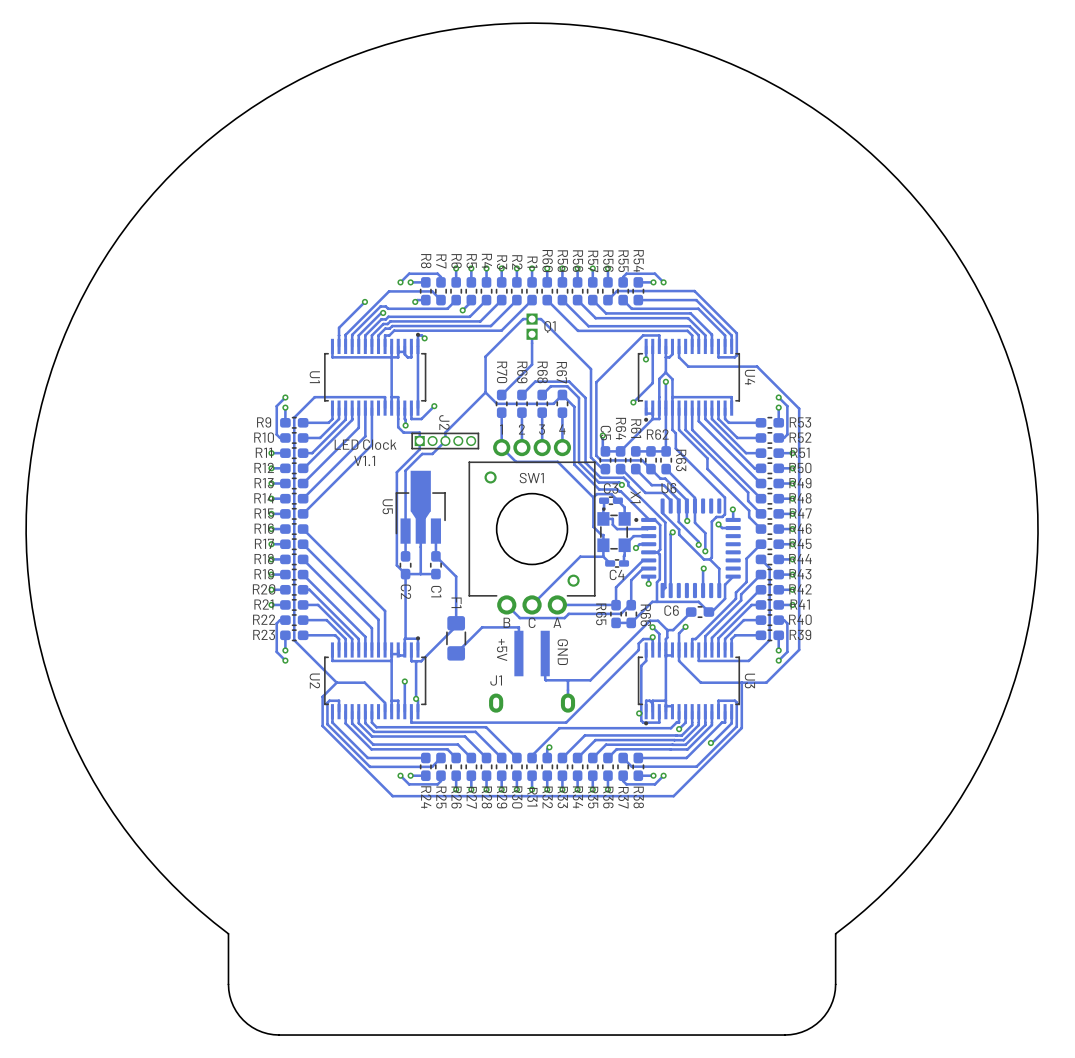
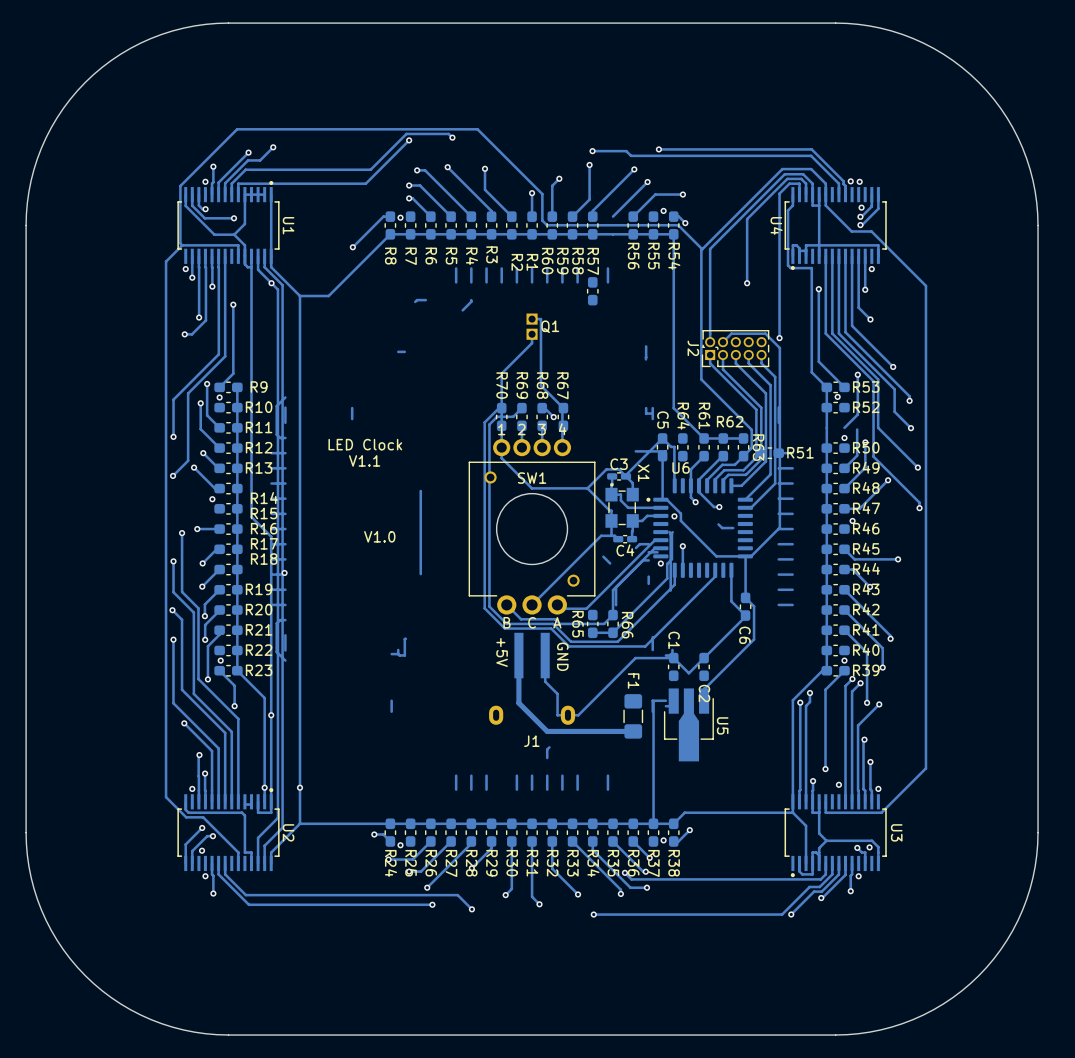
track: none -> (452, 137) (448, 133) (406, 133) (370, 169) (245, 169) (231, 183) (231, 194)
via: none -> (452, 137)
track: none -> (409, 140) (365, 183) (238, 183) (238, 194)
via: none -> (409, 140)
track: none -> (273, 147) (260, 160) (248, 160) (225, 183) (225, 194)
via: none -> (273, 147)
track: none -> (658, 149) (811, 149) (843, 181) (845, 194)
via: none -> (658, 149)
track: none -> (592, 151) (626, 151) (631, 155) (811, 155) (838, 183) (838, 194)
via: none -> (592, 151)
track: none -> (248, 152) (218, 182) (218, 194)
via: none -> (248, 152)
track: none -> (589, 164) (589, 199) (572, 216)
via: none -> (589, 164)
track: none -> (213, 166) (212, 194)
via: none -> (213, 166)
track: none -> (447, 167) (491, 211) (491, 216)
via: none -> (447, 167)
track: none -> (485, 168) (485, 189) (511, 216)
via: none -> (485, 168)
track: none -> (634, 169) (592, 210) (592, 216)
via: none -> (634, 169)
track: none -> (417, 170) (425, 170) (471, 216)
via: none -> (417, 170)
track: none -> (559, 178) (552, 185) (552, 216)
via: none -> (559, 178)
via: none -> (205, 181)
via: none -> (850, 181)
via: none -> (859, 181)
track: none -> (647, 182) (613, 216)
via: none -> (647, 182)
track: none -> (409, 185) (420, 185) (451, 216)
via: none -> (409, 185)
track: none -> (532, 193) (532, 216)
via: none -> (532, 193)
track: none -> (185, 194) (185, 205) (214, 234) (234, 234)
track: none -> (192, 194) (192, 205) (204, 218) (234, 218)
track: none -> (198, 194) (198, 205) (205, 209)
track: none -> (264, 194) (244, 194) (244, 223) (234, 234)
track: none -> (271, 194) (271, 267) (300, 296)
track: none -> (682, 194) (655, 194) (633, 216)
via: none -> (682, 194)
track: none -> (792, 194) (792, 205) (788, 210) (788, 265) (790, 268) (811, 268) (811, 372) (826, 387) (826, 670) (822, 670) (792, 700) (792, 812)
track: none -> (799, 194) (799, 183) (789, 183) (779, 193) (779, 338)
track: none -> (806, 194) (806, 183) (801, 178) (787, 178) (747, 219) (747, 283)
track: none -> (819, 194) (819, 256)
track: none -> (871, 194) (871, 206) (860, 216)
track: none -> (878, 194) (878, 208) (860, 225)
track: none -> (409, 198) (412, 198) (430, 216)
via: none -> (409, 198)
track: none -> (819, 205) (812, 205) (812, 183) (803, 174) (784, 174) (710, 248) (710, 342)
via: none -> (861, 207)
via: none -> (205, 209)
via: none -> (663, 210)
track: none -> (390, 216) (383, 216) (352, 247)
track: none -> (673, 216) (678, 216) (685, 223)
via: none -> (860, 216)
via: none -> (400, 217)
via: none -> (234, 218)
via: none -> (685, 223)
via: none -> (860, 225)
track: none -> (234, 234) (244, 245) (244, 264) (251, 267)
track: none -> (182, 245) (238, 245) (238, 256)
track: none -> (182, 245) (180, 243) (180, 186) (237, 129) (477, 129) (542, 194) (542, 220) (547, 225) (678, 225) (702, 249)
track: none -> (182, 245) (166, 261) (166, 797) (186, 817) (203, 817) (238, 852) (238, 863)
via: none -> (352, 247)
track: none -> (806, 250) (799, 250)
track: none -> (192, 256) (192, 277)
track: none -> (198, 256) (199, 317)
track: none -> (205, 256) (205, 320) (191, 334) (184, 334)
track: none -> (212, 256) (212, 286)
track: none -> (218, 256) (218, 354) (173, 399) (173, 436)
track: none -> (225, 256) (225, 356) (188, 393) (188, 460) (173, 475)
track: none -> (251, 256) (251, 516) (271, 536) (271, 812) (258, 812) (258, 801)
track: none -> (258, 256) (258, 269) (277, 289) (277, 818) (258, 837) (258, 863)
track: none -> (264, 256) (264, 267) (282, 285) (282, 827) (264, 845) (264, 863)
track: none -> (799, 256) (799, 248) (796, 245) (792, 245) (792, 256)
track: none -> (825, 256) (825, 333) (873, 381) (873, 456) (919, 502) (919, 508)
track: none -> (832, 256) (832, 333) (878, 379) (878, 427) (917, 467)
track: none -> (838, 256) (838, 333) (894, 389) (894, 411) (911, 428)
track: none -> (845, 256) (845, 332) (909, 396) (909, 400)
track: none -> (852, 256) (852, 325) (893, 366)
track: none -> (858, 256) (858, 307) (870, 319)
track: none -> (865, 256) (865, 289)
track: none -> (878, 256) (878, 245) (806, 245) (806, 256)
R8 name position: R8 (426, 261) -> R8 (390, 256)
R7 name position: R7 (441, 261) -> R7 (411, 256)
R6 name position: R6 (456, 261) -> R6 (431, 256)
R5 name position: R5 (471, 261) -> R5 (451, 256)
R4 name position: R4 (486, 261) -> R4 (471, 256)
R56 name position: R56 (608, 261) -> R56 (633, 256)
R55 name position: R55 (623, 261) -> R55 (653, 256)
R54 name position: R54 (638, 261) -> R54 (674, 256)
R3 name position: R3 (502, 262) -> R3 (491, 254)
via: (456, 268) -> none
via: (471, 268) -> none
via: (486, 268) -> none
via: (501, 268) -> none
via: (516, 268) -> none
via: (532, 268) -> none
via: (547, 268) -> none
via: (562, 268) -> none
via: (577, 268) -> none
track: (592, 268) (592, 282) -> none
via: (592, 268) -> none
via: (607, 268) -> none
via: none -> (185, 269)
via: none -> (871, 269)
via: none -> (192, 277)
via: (400, 282) -> none
via: (410, 282) -> none
track: (425, 282) (410, 282) -> none
track: (440, 282) (440, 277) (437, 273) (409, 273) (400, 282) -> none
track: (653, 282) (638, 282) -> none
via: (653, 282) -> none
track: (663, 282) (654, 273) (626, 273) (623, 277) (623, 282) -> none
via: (663, 282) -> none
via: none -> (271, 283)
via: none -> (747, 283)
via: none -> (212, 286)
track: none -> (818, 289) (818, 361) (844, 387)
via: none -> (818, 289)
via: none -> (865, 289)
R8 position: (425, 291) -> (390, 225)
R7 position: (440, 291) -> (410, 225)
R6 position: (456, 291) -> (430, 225)
R5 position: (471, 291) -> (451, 225)
R4 position: (486, 291) -> (471, 225)
R3 position: (501, 291) -> (491, 225)
R2 position: (516, 291) -> (511, 225)
R1 position: (532, 291) -> (532, 225)
R60 position: (547, 291) -> (552, 225)
R59 position: (562, 291) -> (572, 225)
R58 position: (577, 291) -> (592, 225)
R56 position: (607, 291) -> (633, 225)
R55 position: (623, 291) -> (653, 225)
R54 position: (638, 291) -> (673, 225)
track: none -> (300, 296) (328, 296) (390, 234) (673, 234) (673, 408) (704, 438) (743, 438)
track: none -> (300, 296) (300, 823)
track: (440, 300) (432, 291) (389, 291) (345, 334) (345, 346) -> none
track: (456, 300) (447, 308) (388, 308) (385, 306) (380, 306) (352, 334) (352, 346) -> none
track: (486, 300) (469, 316) (388, 316) (385, 319) (381, 319) (365, 335) (365, 346) -> none
track: (501, 300) (480, 321) (390, 321) (387, 324) (383, 324) (371, 335) (371, 346) -> none
track: (516, 300) (490, 326) (392, 326) (389, 328) (385, 328) (378, 335) (378, 346) -> none
track: (532, 300) (501, 330) (394, 330) (389, 335) (385, 335) (385, 346) -> none
track: (547, 300) (577, 330) (687, 330) (692, 335) (692, 346) -> none
track: (562, 300) (588, 326) (689, 326) (698, 335) (698, 346) -> none
track: (577, 300) (595, 318) (688, 318) (705, 335) (705, 346) -> none
track: (592, 300) (606, 313) (690, 313) (711, 334) (711, 346) -> none
track: (607, 300) (617, 291) (694, 291) (736, 333) (736, 355) (734, 357) (718, 357) (718, 346) -> none
track: (623, 300) (631, 308) (698, 308) (725, 335) (725, 346) -> none
track: (638, 300) (696, 300) (731, 335) (731, 346) -> none
track: (364, 301) (339, 327) (339, 346) -> none
via: (364, 301) -> none
via: (415, 301) -> none
track: none -> (233, 304) (233, 373) (219, 387)
via: none -> (233, 304)
via: (462, 310) -> none
track: (383, 312) (358, 335) (358, 346) -> none
via: (383, 312) -> none
via: none -> (199, 317)
track: (532, 319) (523, 319) (485, 356) (485, 392) -> none
track: (540, 319) (591, 369) (591, 457) (602, 469) (605, 469) -> (540, 319) (540, 385) (563, 408)
via: none -> (870, 319)
via: none -> (184, 334)
track: (424, 338) (421, 335) (417, 335) (417, 408) -> none
via: (424, 338) -> none
via: none -> (779, 338)
track: none -> (723, 342) (731, 333) (765, 333) (779, 348) (779, 527) (750, 556) (745, 556)
track: (532, 343) (532, 364) (501, 394) -> (532, 343) (501, 373) (501, 408) (499, 408) (484, 422) (484, 608) (504, 628) (551, 628) (569, 646) (645, 646) (715, 576) (715, 570)
track: (391, 346) (391, 408) -> none
track: (398, 346) (398, 357) (332, 357) (332, 346) -> none
track: (411, 346) (411, 357) (404, 354) (404, 346) -> none
track: (652, 346) (652, 383) (633, 402) -> none
track: (659, 346) (659, 335) (643, 335) (596, 382) (596, 455) (601, 460) (642, 460) (660, 478) (665, 478) (686, 500) (687, 520) -> none
track: (665, 346) (665, 372) (659, 378) (659, 419) (652, 419) (620, 451) (605, 451) (602, 448) (602, 435) -> none
track: (672, 346) (672, 354) (665, 357) -> none
track: (679, 346) (679, 357) (688, 366) (757, 366) (799, 408) (799, 649) (766, 682) (700, 682) (679, 660) (679, 633) (685, 626) -> none
track: none -> (710, 355) (710, 363) (756, 409) (756, 457) (743, 470) (724, 470) (715, 479) (715, 485)
track: none -> (723, 355) (723, 369) (761, 407) (761, 459) (745, 474) (728, 474) (723, 480) (723, 485)
track: none -> (735, 355) (735, 363) (765, 393) (765, 461) (741, 485) (731, 485)
track: none -> (748, 355) (748, 363) (770, 385) (770, 474) (745, 499)
track: none -> (761, 355) (761, 363) (775, 377) (775, 483) (751, 507) (745, 507)
via: (645, 359) -> none
via: none -> (893, 366)
track: (665, 372) (672, 379) (672, 397) -> none
U1 position: (375, 374) -> (228, 222)
track: none -> (857, 374) (857, 414) (844, 427)
via: none -> (857, 374)
U1 name position: U1 (314, 377) -> U1 (288, 225)
U4 name position: U4 (749, 377) -> U4 (776, 225)
U4 position: (688, 380) -> (835, 228)
track: (665, 381) (666, 451) -> none
via: (665, 381) -> none
track: none -> (207, 383) (207, 415) (219, 427)
via: none -> (207, 383)
track: none -> (237, 387) (237, 670) (264, 698) (264, 801)
track: (485, 392) (496, 403) (553, 403) (562, 394) (574, 406) (574, 464) (599, 489) (617, 489) (620, 491) (648, 519) (654, 519) (660, 525) (660, 549) (657, 552) (659, 554) (659, 579) (656, 582) (656, 601) -> none
track: (485, 392) (445, 432) (445, 441) (432, 453) (422, 453) (405, 470) (405, 556) -> none
track: (521, 394) (535, 381) (569, 381) (585, 397) (585, 462) (600, 477) (623, 477) (628, 482) (628, 485) (665, 522) (665, 587) (662, 590) -> none
track: (542, 394) (550, 386) (567, 386) (578, 397) (578, 462) (598, 482) (619, 482) (621, 484) -> none
via: none -> (837, 396)
via: none -> (219, 397)
via: (285, 397) -> none
track: (391, 397) (398, 397) (398, 427) (403, 432) (419, 432) (419, 449) (396, 472) (396, 565) (405, 574) -> none
track: (672, 397) (672, 429) (675, 433) (675, 448) (724, 497) (724, 514) (722, 516) (716, 516) (711, 521) (711, 557) (709, 559) -> none
track: (672, 397) (731, 397) (731, 408) -> none
track: (778, 397) (787, 406) (787, 434) (784, 437) (778, 437) -> none
via: (778, 397) -> none
via: none -> (909, 400)
via: (633, 402) -> none
track: none -> (200, 403) (200, 429) (219, 448)
via: none -> (200, 403)
R70 position: (501, 403) -> (501, 416)
R69 position: (521, 403) -> (521, 416)
R68 position: (542, 403) -> (542, 416)
R67 position: (562, 403) -> (563, 416)
track: (434, 406) (421, 419) (411, 419) (411, 408) -> none
via: (434, 406) -> none
via: (285, 407) -> none
via: (778, 407) -> none
track: (332, 408) (332, 419) (328, 422) (303, 422) -> none
track: (339, 408) (339, 419) (320, 437) (303, 437) -> none
track: (345, 408) (345, 419) (312, 453) (303, 453) -> none
track: (358, 408) (358, 427) (303, 483) -> none
track: (365, 408) (365, 436) (303, 498) -> none
track: (371, 408) (371, 445) (303, 513) -> none
track: (385, 408) (385, 397) (314, 397) (294, 417) (294, 640) (336, 682) -> none
track: (404, 408) (405, 425) -> none
track: none -> (521, 408) (513, 416) (497, 416) (489, 424) (489, 606) (506, 623) (553, 623) (570, 641) (617, 641) (674, 584) (674, 570)
track: none -> (542, 408) (544, 408) (553, 417)
track: (679, 408) (679, 429) (707, 458) (707, 468) (749, 510) (749, 517) (761, 529) -> none
track: (685, 408) (685, 429) (748, 492) (748, 501) (761, 513) -> none
track: (692, 408) (692, 429) (761, 498) -> none
track: (698, 408) (698, 421) (761, 483) -> none
track: (705, 408) (705, 419) (754, 468) (761, 468) -> none
track: (711, 408) (711, 419) (746, 453) (761, 453) -> none
track: (718, 408) (718, 419) (737, 437) (761, 437) -> none
track: (725, 408) (725, 419) (728, 422) (761, 422) -> none
track: (521, 412) (521, 425) -> none
track: (542, 412) (542, 425) -> none
via: none -> (553, 417)
track: (352, 419) (303, 468) -> none
R9 name position: R9 (264, 422) -> R9 (259, 387)
R9 position: (294, 422) -> (228, 387)
J2 name position: J2 (444, 422) -> J2 (693, 348)
R53 position: (769, 422) -> (835, 387)
via: (405, 425) -> none
via: none -> (911, 428)
track: none -> (857, 429) (857, 455) (844, 468)
J2 footprint: [411, 432, 480, 450] -> [701, 330, 770, 368]
via: (602, 435) -> none
via: none -> (173, 436)
R10 name position: R10 (264, 437) -> R10 (259, 407)
R10 position: (294, 437) -> (228, 407)
R52 position: (769, 437) -> (835, 407)
via: none -> (844, 437)
track: none -> (865, 442) (865, 467) (844, 488)
via: none -> (865, 442)
track: (501, 447) (515, 461) (557, 461) (593, 497) -> (501, 447) (501, 458) (531, 488) (587, 488)
R11 name position: R11 (263, 452) -> R11 (259, 427)
track: none -> (203, 453) (219, 468)
via: none -> (203, 453)
via: (271, 453) -> none
R11 position: (294, 453) -> (228, 427)
via: (792, 453) -> none
track: none -> (662, 456) (662, 499)
track: none -> (704, 456) (690, 469) (690, 497) (695, 502)
track: none -> (723, 456) (699, 479) (699, 492) (713, 507) (719, 507)
C5 position: (605, 460) -> (662, 447)
R64 position: (620, 460) -> (682, 447)
R61 position: (635, 460) -> (704, 447)
R62 position: (650, 460) -> (723, 447)
R63 position: (666, 460) -> (743, 447)
track: none -> (194, 467) (215, 488) (219, 488)
via: none -> (194, 467)
R12 name position: R12 (264, 467) -> R12 (259, 447)
via: none -> (917, 467)
via: (271, 468) -> none
R12 position: (294, 468) -> (228, 448)
R50 position: (769, 468) -> (835, 448)
via: (792, 468) -> none
track: (620, 469) (645, 492) (663, 492) (670, 500) (670, 506) -> none
track: (635, 469) (651, 485) (663, 485) (678, 500) (678, 521) (698, 541) (698, 544) -> none
track: (666, 469) (694, 497) (694, 522) (705, 533) (705, 551) -> none
via: none -> (173, 475)
track: none -> (625, 475) (662, 438) (671, 446) (674, 446) (674, 485)
track: none -> (612, 476) (611, 494) (620, 494) (620, 500) (628, 507) (660, 507)
track: none -> (888, 480) (859, 508) (844, 508)
via: none -> (888, 480)
R13 name position: R13 (264, 483) -> R13 (259, 467)
via: (271, 483) -> none
R13 position: (294, 483) -> (228, 468)
R49 position: (769, 483) -> (835, 468)
via: (792, 483) -> none
via: (621, 484) -> none
track: none -> (707, 485) (707, 480) (722, 464) (734, 464) (751, 448) (751, 429) (701, 379) (701, 250) (782, 169) (811, 169) (825, 183) (825, 205) (851, 231) (871, 231) (925, 285) (925, 768) (881, 812) (825, 812) (825, 801)
track: none -> (587, 488) (606, 469) (619, 469) (632, 483) (632, 494)
track: none -> (587, 488) (611, 510) (611, 535)
track: (593, 497) (593, 526) (603, 535) (603, 556) (580, 556) -> (618, 539) (614, 535) (601, 535) (580, 556)
track: (593, 497) (596, 494) (611, 494) (624, 507) (624, 518) -> none
via: (271, 498) -> none
R14 position: (294, 498) -> (228, 488)
R48 position: (769, 498) -> (835, 488)
via: (792, 498) -> none
via: none -> (212, 499)
track: none -> (660, 499) (666, 499) (680, 513) (680, 520) (716, 556) (745, 556)
track: (604, 500) (603, 518) (612, 518) (612, 524) (617, 529) (648, 528) -> none
C3 position: (610, 500) -> (619, 476)
via: none -> (695, 502)
track: (662, 506) (662, 513) (679, 529) (679, 534) (703, 559) (709, 559) -> none
U5 rotation: 0° (420, 507) -> 180° (688, 724)
U5 position: (420, 507) -> (688, 724)
via: none -> (719, 507)
via: none -> (919, 508)
track: (732, 509) (733, 519) -> none
via: (732, 509) -> none
via: (271, 513) -> none
R15 position: (294, 513) -> (228, 508)
R47 position: (769, 513) -> (835, 508)
via: (792, 513) -> none
track: none -> (660, 515) (647, 515) (642, 520) (632, 520) (632, 539)
via: none -> (674, 516)
via: (687, 520) -> none
via: none -> (852, 520)
via: (718, 524) -> none
via: none -> (197, 529)
track: none -> (219, 529) (197, 529)
via: (271, 529) -> none
R16 position: (294, 529) -> (228, 529)
track: (303, 529) (385, 611) (385, 650) -> none
X1 position: (614, 529) -> (622, 505)
R46 position: (769, 529) -> (835, 529)
via: (792, 529) -> none
track: (435, 531) (435, 556) (456, 576) (456, 626) (421, 661) (411, 660) (411, 650) -> none
track: none -> (669, 532) (671, 534) (671, 559) (667, 563) (667, 578) (613, 632) (592, 632)
via: (672, 532) -> none
track: none -> (182, 533) (182, 591) (198, 608) (198, 679) (238, 718) (238, 801)
via: none -> (182, 533)
text: none -> V1.0 (379, 536)
track: (648, 536) (633, 536) (624, 545) (624, 563) -> none
via: (271, 544) -> none
R17 position: (294, 544) -> (228, 549)
track: (303, 544) (378, 619) (378, 650) -> none
via: (698, 544) -> none
track: (761, 544) (746, 558) (746, 581) (735, 592) (735, 598) (695, 639) (692, 639) (692, 650) -> none
R45 position: (769, 544) -> (835, 549)
via: (792, 544) -> none
track: none -> (682, 546) (682, 570)
via: none -> (682, 546)
via: (635, 548) -> none
U6 position: (687, 548) -> (699, 528)
track: none -> (219, 549) (216, 549) (202, 563)
track: none -> (844, 549) (854, 559) (898, 559)
via: (705, 551) -> none
track: none -> (745, 556) (745, 597) (754, 606) (754, 639) (704, 688)
via: (271, 559) -> none
R18 position: (294, 559) -> (228, 569)
track: (303, 559) (371, 628) (371, 650) -> none
track: (709, 559) (719, 568) (719, 590) -> none
track: (761, 559) (769, 568) (769, 640) (748, 660) (698, 660) (698, 650) -> none
R44 position: (769, 559) -> (835, 569)
via: (792, 559) -> none
via: none -> (898, 559)
track: none -> (173, 561) (173, 592) (193, 612) (193, 693) (231, 731) (231, 801)
via: none -> (173, 561)
via: none -> (202, 563)
C4 position: (617, 563) -> (625, 539)
via: none -> (660, 563)
C2 position: (405, 565) -> (704, 666)
C1 position: (435, 565) -> (673, 666)
track: (648, 568) (643, 568) (631, 580) (631, 605) -> none
track: (703, 568) (703, 590) -> none
via: (703, 568) -> none
track: none -> (219, 569) (202, 586)
track: none -> (844, 569) (852, 569) (870, 586)
via: none -> (284, 572)
R19 name position: R19 (264, 574) -> R19 (259, 589)
via: (271, 574) -> none
R19 position: (294, 574) -> (228, 589)
track: (303, 574) (365, 636) (365, 650) -> none
track: (405, 574) (405, 638) (417, 638) (417, 650) -> none
track: (435, 574) (405, 574) -> none
track: (761, 574) (741, 594) (741, 600) (705, 636) (705, 650) -> none
R43 position: (769, 574) -> (835, 589)
via: (792, 574) -> none
track: (733, 576) (725, 584) (725, 598) (711, 612) (708, 612) (698, 601) (652, 601) (631, 622) (616, 622) -> none
via: (648, 583) -> none
via: none -> (202, 586)
via: none -> (870, 586)
track: none -> (219, 589) (204, 604) (204, 616)
R20 name position: R20 (264, 589) -> R20 (259, 609)
via: (271, 589) -> none
R20 position: (294, 589) -> (228, 610)
track: (303, 589) (309, 589) (358, 639) (358, 650) -> none
track: (761, 589) (711, 637) (711, 650) -> none
R42 position: (769, 589) -> (835, 610)
via: (792, 589) -> none
track: none -> (844, 589) (890, 635) (890, 638)
C1 name position: C1 (436, 591) -> C1 (674, 640)
track: (631, 603) (620, 613) (568, 613) (564, 618) (519, 618) -> (660, 548) (654, 548) (613, 590) (613, 615) (604, 623) (559, 623) (555, 619) (519, 618)
R21 name position: R21 (263, 604) -> R21 (259, 629)
via: (271, 604) -> none
R21 position: (294, 604) -> (228, 630)
track: (303, 604) (318, 604) (352, 639) (352, 650) -> none
track: (616, 604) (557, 604) -> (660, 540) (655, 540) (586, 608) (561, 608) (557, 604)
track: (761, 604) (751, 604) (718, 638) (718, 650) -> none
R41 position: (769, 604) -> (835, 630)
via: (792, 604) -> none
track: none -> (172, 610) (182, 619) (182, 689) (225, 732) (225, 801)
via: none -> (172, 610)
track: none -> (219, 610) (205, 624) (205, 639)
C6 name position: C6 (671, 610) -> C6 (744, 635)
track: none -> (844, 610) (882, 648) (882, 667)
track: (691, 612) (673, 630) (667, 630) -> none
C6 rotation: 0° (700, 612) -> 90° clockwise (745, 606)
C6 position: (700, 612) -> (745, 606)
R65 position: (616, 614) -> (592, 623)
R66 position: (631, 614) -> (613, 623)
via: none -> (204, 616)
R22 name position: R22 (264, 619) -> R22 (259, 650)
R22 position: (294, 620) -> (228, 650)
track: (303, 620) (326, 620) (345, 639) (345, 650) -> none
track: (761, 620) (743, 620) (725, 638) (725, 650) -> none
R40 position: (769, 620) -> (835, 650)
track: (778, 620) (784, 620) (787, 623) (787, 651) (778, 660) -> none
via: (685, 626) -> none
track: (652, 627) (659, 633) (659, 650) -> none
via: (652, 627) -> none
track: none -> (219, 630) (219, 634) (207, 646) (207, 679)
J1 footprint: [489, 630, 576, 713] -> [489, 632, 576, 725]
track: (667, 630) (658, 620) (649, 620) (590, 680) (545, 679) -> (731, 570) (731, 601) (745, 616) (688, 673) (673, 658) (635, 658) (578, 715) (557, 715) (557, 694) (545, 679)
track: (667, 630) (665, 711) -> none
track: none -> (844, 630) (867, 652) (867, 702)
R23 name position: R23 (264, 634) -> R23 (259, 670)
R23 position: (294, 635) -> (228, 670)
track: (303, 635) (335, 635) (339, 639) (339, 650) -> none
track: (761, 635) (735, 635) (731, 639) (731, 650) -> none
R39 position: (769, 635) -> (835, 670)
track: (778, 635) (778, 650) -> none
via: (652, 637) -> none
F1 position: (456, 638) -> (633, 716)
via: none -> (890, 638)
track: none -> (173, 639) (173, 703) (218, 748) (218, 801)
via: none -> (173, 639)
via: none -> (205, 639)
track: (652, 639) (643, 639) (638, 643) (638, 650) (566, 722) (411, 722) (411, 711) -> none
via: (285, 650) -> none
track: (332, 650) (332, 660) (391, 660) -> none
track: (391, 650) (391, 700) (398, 700) (398, 711) -> none
track: (646, 650) (646, 660) (641, 665) (641, 720) (643, 722) (659, 722) (659, 711) -> none
via: (778, 650) -> none
track: (456, 653) (482, 627) (518, 627) (518, 653) -> none
track: none -> (518, 655) (518, 703) (547, 731) (633, 731)
via: none -> (220, 660)
via: (285, 660) -> none
via: (778, 660) -> none
via: none -> (844, 660)
track: (416, 661) (417, 711) -> none
via: none -> (882, 667)
track: none -> (219, 670) (234, 685) (234, 706)
track: none -> (844, 670) (825, 689) (825, 769)
U2 position: (375, 677) -> (228, 829)
via: none -> (207, 679)
track: none -> (852, 679) (845, 685) (845, 801)
via: none -> (852, 679)
J1 name position: J1 (496, 680) -> J1 (531, 741)
track: (567, 680) (567, 703) -> none
U2 name position: U2 (314, 681) -> U2 (288, 832)
track: (404, 681) (404, 711) -> none
via: (404, 681) -> none
track: (336, 682) (364, 682) (385, 702) (385, 711) -> none
track: (741, 682) (741, 728) (673, 796) (392, 796) (322, 726) (322, 696) (336, 682) -> none
U3 position: (688, 683) -> (835, 835)
track: none -> (860, 683) (852, 691) (852, 801)
via: none -> (860, 683)
track: none -> (809, 692) (809, 702) (806, 705) (806, 801)
via: none -> (809, 692)
via: (416, 698) -> none
track: none -> (653, 701) (653, 823)
track: none -> (800, 702) (799, 801)
via: none -> (800, 702)
via: none -> (867, 702)
track: (652, 703) (646, 700) (646, 711) -> none
track: none -> (879, 704) (858, 725) (858, 801)
via: none -> (879, 704)
via: none -> (234, 706)
track: (332, 711) (332, 722) (367, 758) (425, 758) -> none
track: (339, 711) (339, 700) (329, 700) (327, 702) (327, 724) (369, 766) (432, 766) (440, 758) -> none
track: (345, 711) (345, 723) (371, 749) (447, 749) (456, 758) -> none
track: (352, 711) (352, 723) (373, 744) (457, 744) (471, 758) -> none
track: (358, 711) (358, 723) (372, 736) (465, 736) (486, 758) -> none
track: (365, 711) (365, 723) (374, 731) (475, 731) (501, 758) -> none
track: (371, 711) (371, 722) (376, 727) (486, 727) (516, 758) -> none
track: (679, 711) (679, 722) (670, 728) (559, 728) (532, 755) (532, 758) -> none
track: (685, 711) (685, 722) (679, 729) -> none
track: (692, 711) (692, 725) (681, 735) (676, 735) -> none
track: (698, 711) (698, 725) (683, 740) (674, 740) -> none
track: (705, 711) (705, 725) (685, 744) (672, 744) -> none
track: (711, 711) (711, 725) (687, 749) (670, 749) -> none
track: (718, 711) (718, 700) (734, 700) (736, 702) (736, 726) (696, 766) (631, 766) (623, 758) -> none
track: (725, 711) (725, 722) (721, 722) (686, 758) (638, 758) -> none
track: (731, 711) (731, 723) (710, 742) -> none
via: (639, 713) -> none
via: none -> (271, 715)
track: none -> (184, 723) (212, 751) (212, 801)
via: none -> (184, 723)
via: (679, 729) -> none
track: (676, 735) (584, 735) (562, 758) -> none
track: none -> (864, 739) (863, 789) (865, 801)
via: none -> (864, 739)
track: (674, 740) (595, 740) (577, 758) -> none
via: (710, 742) -> none
track: (672, 744) (606, 744) (592, 758) -> none
via: (549, 747) -> none
track: (670, 749) (616, 749) (607, 758) -> none
track: none -> (199, 755) (198, 801)
via: none -> (199, 755)
track: none -> (870, 761) (871, 801)
via: none -> (870, 761)
R24 position: (425, 766) -> (390, 832)
R25 position: (440, 766) -> (410, 832)
R26 position: (456, 766) -> (430, 832)
R27 position: (471, 766) -> (451, 832)
R28 position: (486, 766) -> (471, 832)
R29 position: (501, 766) -> (491, 832)
R30 position: (516, 766) -> (511, 832)
R31 position: (532, 766) -> (532, 832)
R32 position: (547, 766) -> (552, 832)
R33 position: (562, 766) -> (572, 832)
R34 position: (577, 766) -> (592, 832)
R35 position: (592, 766) -> (613, 832)
R36 position: (607, 766) -> (633, 832)
R37 position: (623, 766) -> (653, 832)
R38 position: (638, 766) -> (673, 832)
via: none -> (825, 769)
track: none -> (205, 773) (205, 801)
via: none -> (205, 773)
via: (400, 775) -> none
via: (410, 775) -> none
track: (425, 775) (410, 775) -> none
track: (440, 775) (440, 781) (437, 784) (409, 784) (400, 775) -> none
track: (501, 775) (501, 789) -> none
track: (592, 775) (592, 789) -> none
track: (653, 775) (638, 775) -> none
via: (653, 775) -> none
track: (663, 775) (654, 784) (626, 784) (623, 781) (623, 775) -> none
via: (663, 775) -> none
track: none -> (813, 781) (812, 812) (819, 812)
via: none -> (813, 781)
via: none -> (838, 784)
via: none -> (264, 787)
via: none -> (300, 787)
via: none -> (192, 788)
via: none -> (878, 788)
via: (456, 789) -> none
via: (471, 789) -> none
via: (486, 789) -> none
via: (501, 789) -> none
via: (516, 789) -> none
via: (532, 789) -> none
via: (547, 789) -> none
via: (562, 789) -> none
via: (577, 789) -> none
via: (592, 789) -> none
via: (607, 789) -> none
track: none -> (185, 801) (185, 809) (188, 812) (241, 812) (244, 815) (244, 852) (251, 852) (251, 863)
track: none -> (819, 801) (819, 833) (826, 840)
track: none -> (251, 804) (244, 804)
track: none -> (792, 812) (684, 812) (673, 823) (300, 823)
track: none -> (792, 812) (806, 825) (806, 863)
track: none -> (300, 823) (271, 852) (271, 863)
track: none -> (202, 827) (185, 844) (185, 863)
via: none -> (202, 827)
track: none -> (689, 830) (678, 841) (673, 841)
via: none -> (689, 830)
track: none -> (374, 834) (383, 834) (390, 841)
via: none -> (374, 834)
track: none -> (212, 836) (207, 836) (192, 851) (192, 863)
via: none -> (212, 836)
via: none -> (663, 840)
track: none -> (826, 840) (872, 840) (878, 847) (878, 863)
track: none -> (826, 840) (819, 848) (819, 863)
track: none -> (430, 841) (412, 859) (388, 859)
track: none -> (451, 841) (420, 871) (409, 871)
track: none -> (471, 841) (427, 887)
track: none -> (491, 841) (491, 848) (471, 868)
track: none -> (511, 841) (511, 888) (505, 895)
track: none -> (532, 841) (532, 896) (539, 904)
track: none -> (552, 841) (552, 868) (578, 894)
track: none -> (572, 841) (620, 889) (620, 893)
track: none -> (592, 841) (592, 850) (630, 887) (646, 887)
track: none -> (613, 841) (643, 871) (645, 871)
track: none -> (633, 841) (649, 857)
via: none -> (400, 845)
track: none -> (857, 847) (861, 852) (865, 852) (865, 863)
via: none -> (857, 847)
via: none -> (869, 847)
via: none -> (202, 850)
track: none -> (819, 855) (812, 852) (812, 874) (802, 874) (799, 871) (799, 863)
via: none -> (649, 857)
via: none -> (388, 859)
track: none -> (212, 863) (213, 893)
track: none -> (218, 863) (218, 874) (248, 904) (432, 904)
track: none -> (225, 863) (225, 874) (245, 895) (457, 895) (471, 909)
track: none -> (825, 863) (825, 874) (820, 879) (631, 879) (624, 872)
track: none -> (832, 863) (832, 874) (819, 886) (809, 886) (782, 914) (593, 914)
track: none -> (838, 863) (838, 874) (821, 891) (814, 891) (791, 914)
track: none -> (845, 863) (845, 874) (821, 898)
track: none -> (852, 863) (850, 891)
via: none -> (471, 868)
via: none -> (409, 871)
via: none -> (645, 871)
via: none -> (624, 872)
via: none -> (205, 876)
via: none -> (858, 876)
via: none -> (427, 887)
via: none -> (646, 887)
via: none -> (850, 891)
via: none -> (213, 893)
via: none -> (620, 893)
via: none -> (578, 894)
via: none -> (505, 895)
via: none -> (821, 898)
via: none -> (432, 904)
via: none -> (539, 904)
via: none -> (471, 909)
via: none -> (593, 914)
via: none -> (791, 914)
board edge: (785, 1035) (807, 1030) (816, 1023) (827, 1011) (835, 990) (835, 933) (878, 897) (928, 843) (970, 781) (1002, 714) (1020, 662) (1028, 625) (1037, 552) (1035, 477) (1022, 404) (999, 334) (974, 284) (955, 252) (934, 221) (897, 179) (842, 129) (780, 88) (747, 71) (696, 50) (642, 35) (606, 28) (532, 23) (476, 26) (439, 31) (367, 50) (299, 79) (251, 108) (221, 129) (179, 166) (153, 193) (108, 252) (89, 284) (65, 334) (41, 404) (28, 477) (26, 552) (32, 607) (39, 644) (61, 714) (93, 781) (135, 843) (172, 885) (228, 933) (228, 990) (236, 1011) (247, 1023) (257, 1030) (279, 1035) -> (785, 1035) (846, 1034) (880, 1029) (923, 1014) (961, 990) (993, 958) (1017, 920) (1032, 877) (1037, 843) (1038, 225) (1032, 180) (1022, 148) (1007, 117) (986, 90) (961, 67) (933, 48) (902, 34) (869, 25) (846, 23) (205, 24) (183, 28) (151, 38) (111, 60) (77, 90) (51, 127) (41, 148) (31, 180) (26, 225) (26, 832) (31, 877) (46, 920) (63, 949) (85, 975) (120, 1004) (151, 1019) (194, 1032) (217, 1034) (279, 1035)

